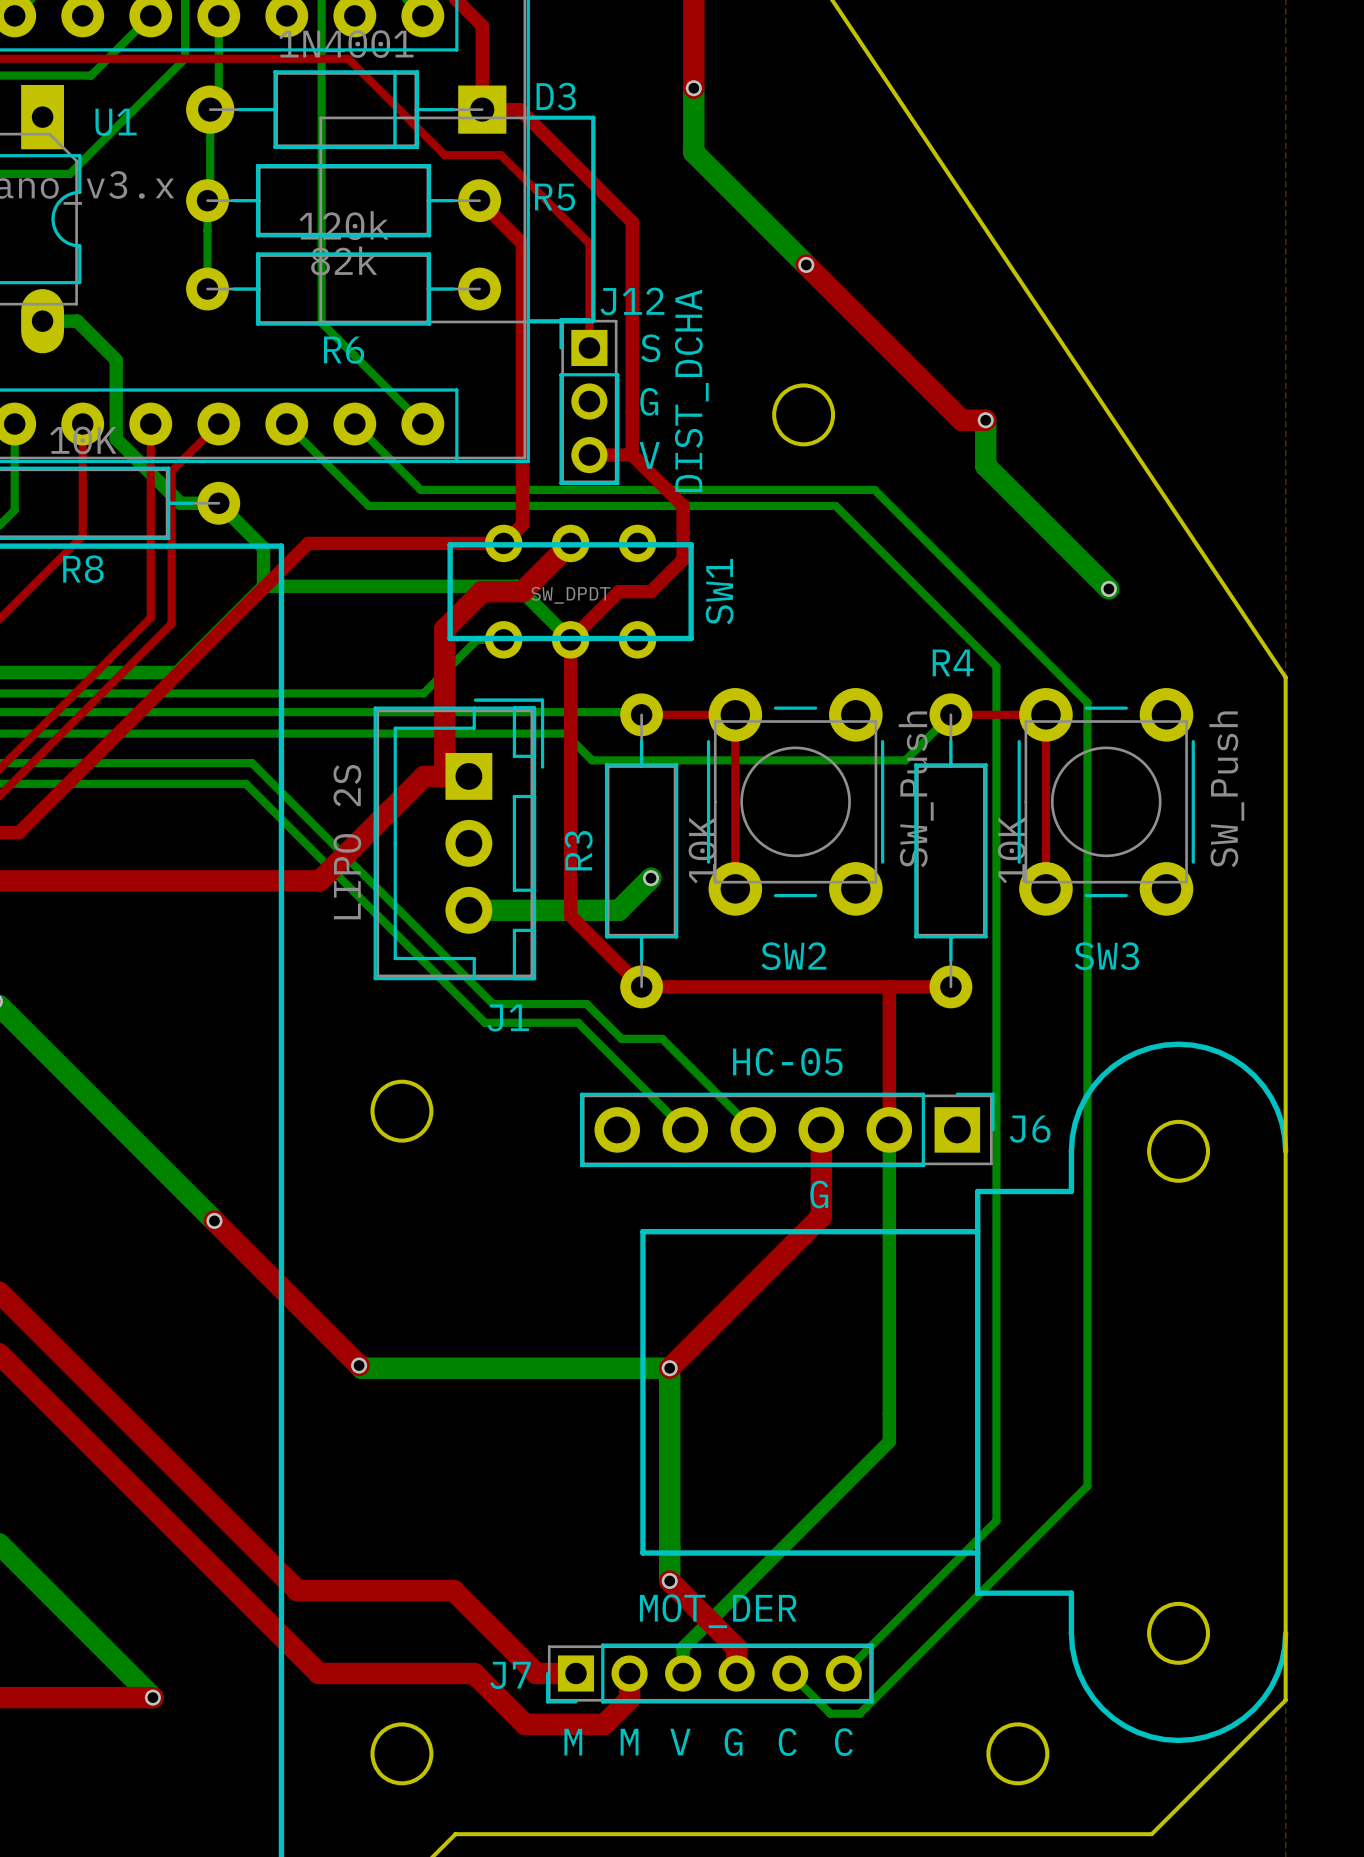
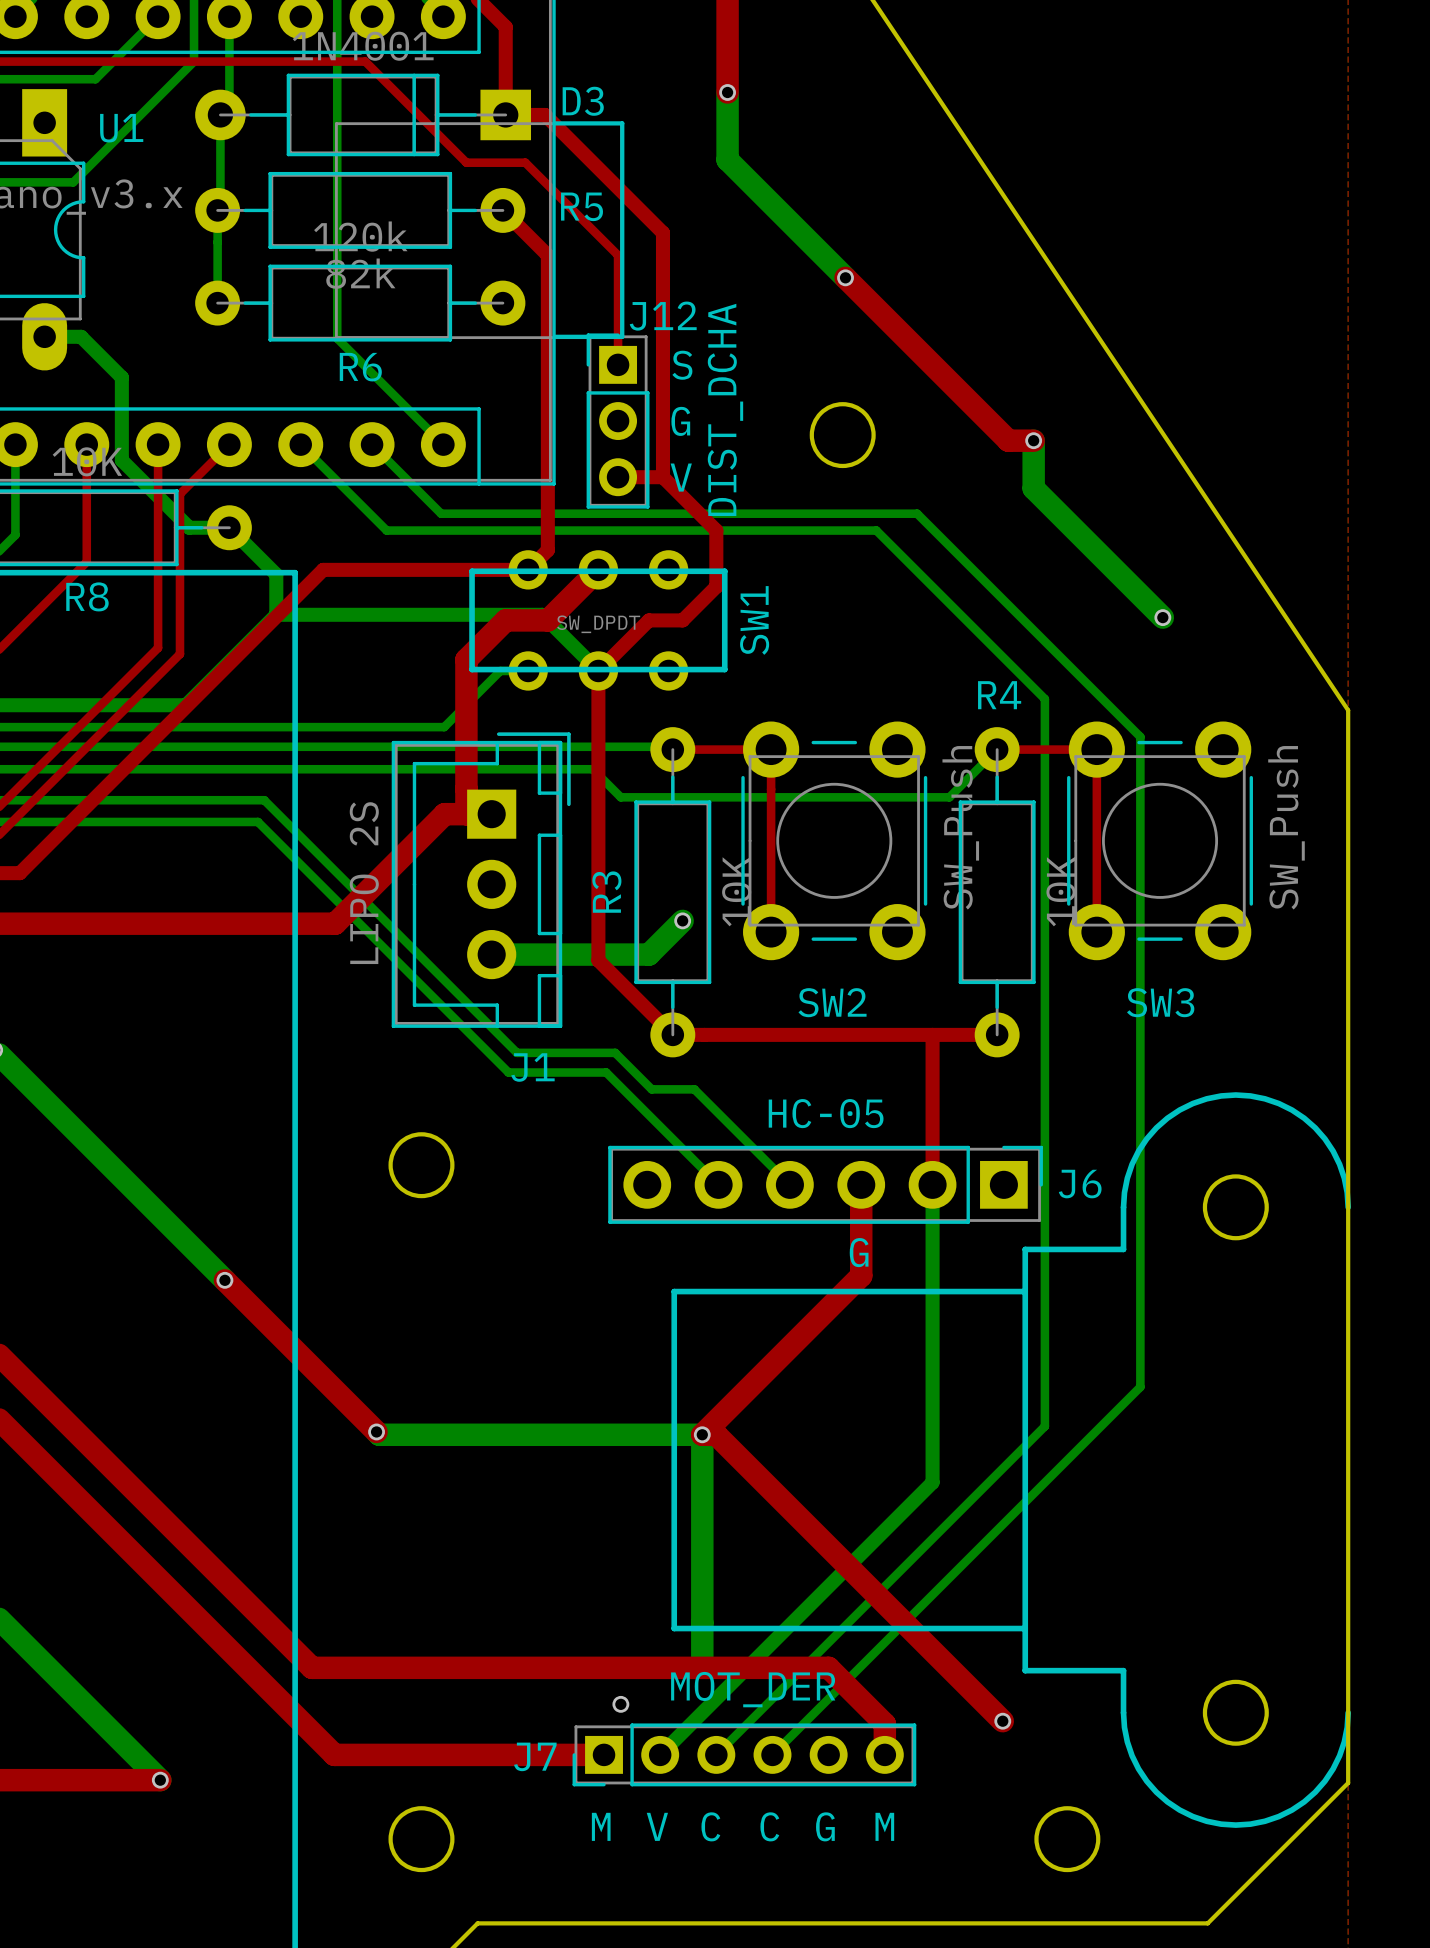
bottom track: (1087, 1322) (1087, 1486) (859, 1713) (830, 1713) (790, 1673) -> (1140, 1387) (772, 1754)
bottom track: (996, 1360) (996, 1520) (843, 1673) -> (1044, 1426) (716, 1754)
top track: none -> (702, 1434) (716, 1434) (1002, 1721)
bottom track: (889, 1413) (889, 1441) (683, 1647) (683, 1673) -> (932, 1482) (660, 1754)
top track: (669, 1580) (736, 1647) (736, 1673) -> none
via position: (669, 1580) -> (620, 1704)
top track: (453, 1590) (536, 1673) -> (497, 1754) (562, 1754)
top track: none -> (475, 1667) (828, 1667) (884, 1724) (884, 1754)
via: none -> (1002, 1721)
top track: (474, 1673) (525, 1724) (604, 1724) (629, 1699) (629, 1673) -> none
text: M (629, 1742) -> V (657, 1826)
text: V (680, 1742) -> C (710, 1826)
text: G (733, 1742) -> C (769, 1826)
text: C (787, 1742) -> G (825, 1826)
text: C (843, 1742) -> M (884, 1826)

